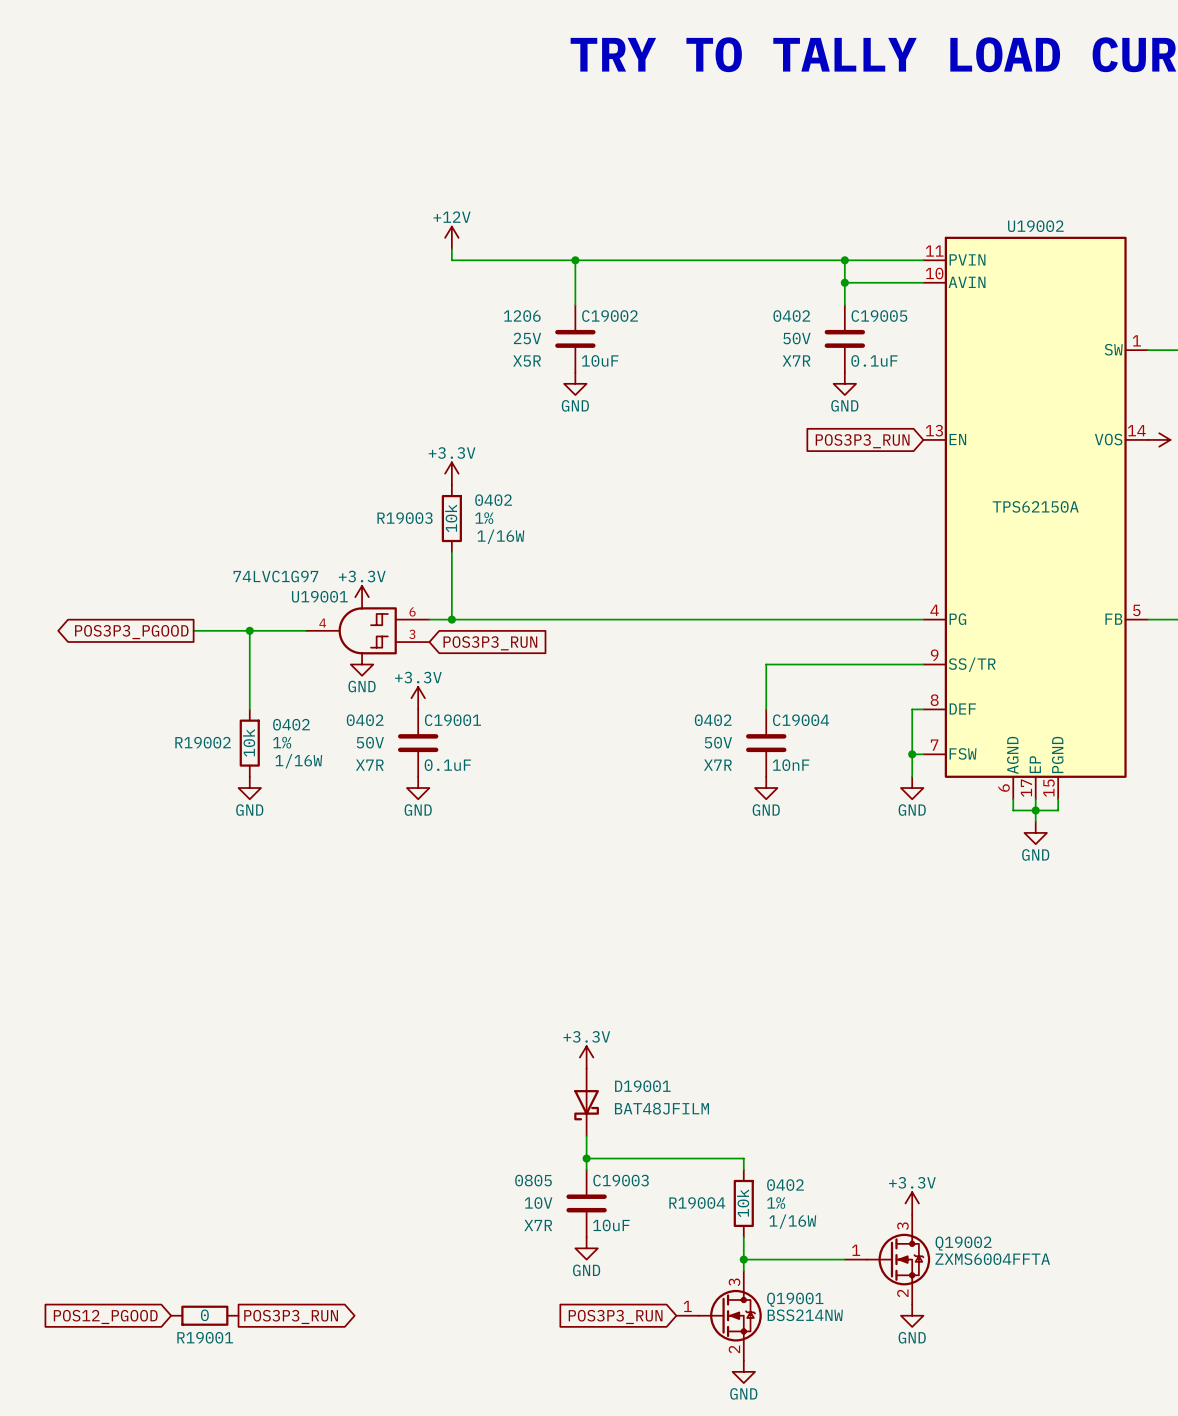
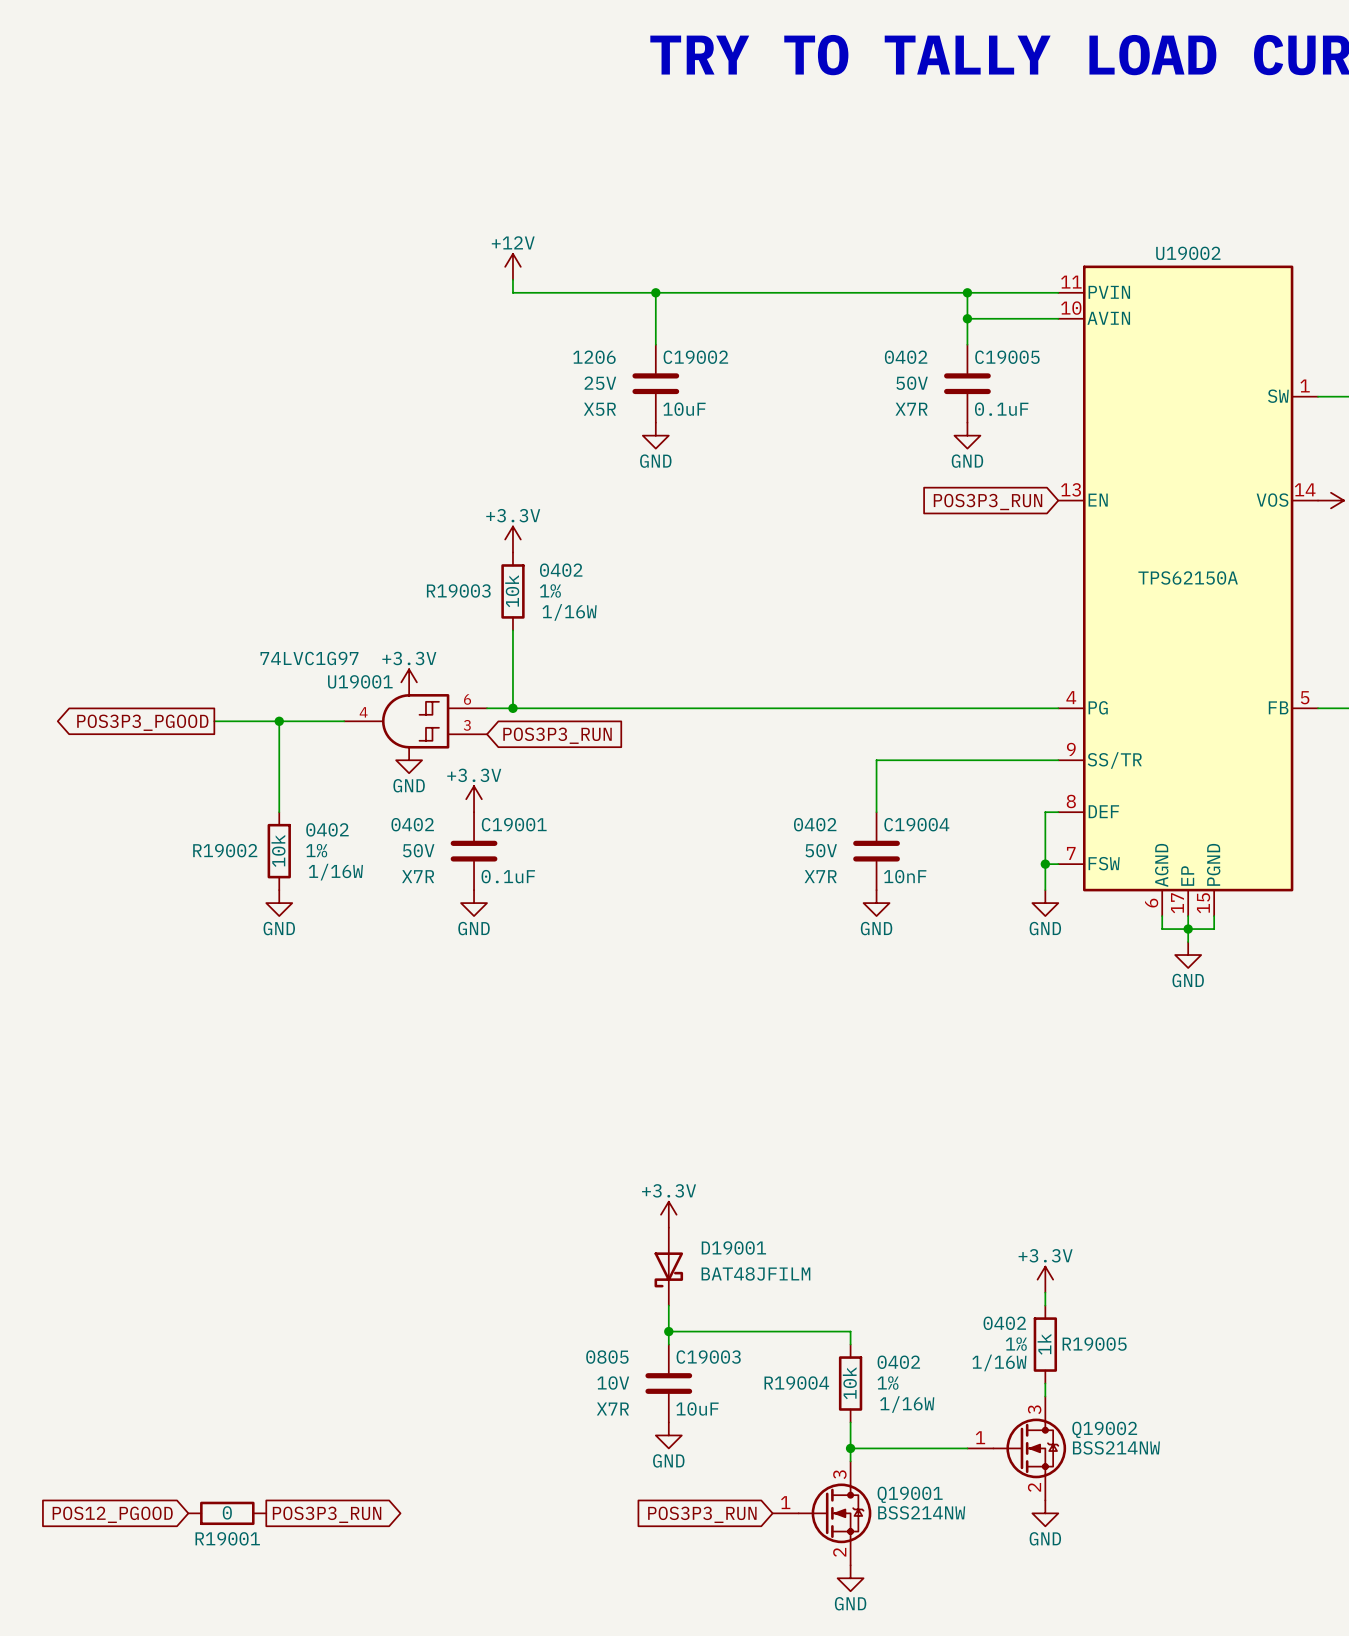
wire: none -> (1045, 1292) (1045, 1305)
R19005: none -> 1k (1045, 1344)
power symbol position: +3.3V (912, 1203) -> +3.3V (1045, 1279)
Q19002 value: ZXMS6004FFTA (992, 1259) -> BSS214NW (1116, 1447)

